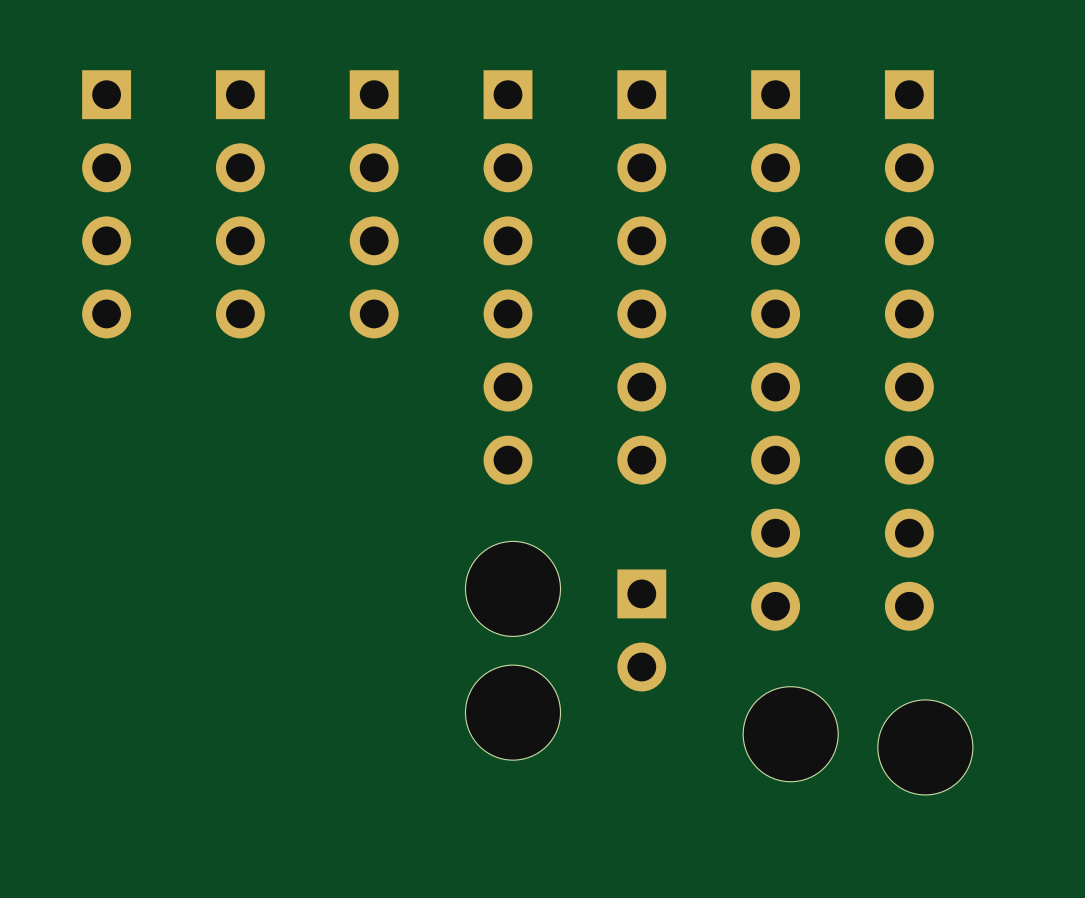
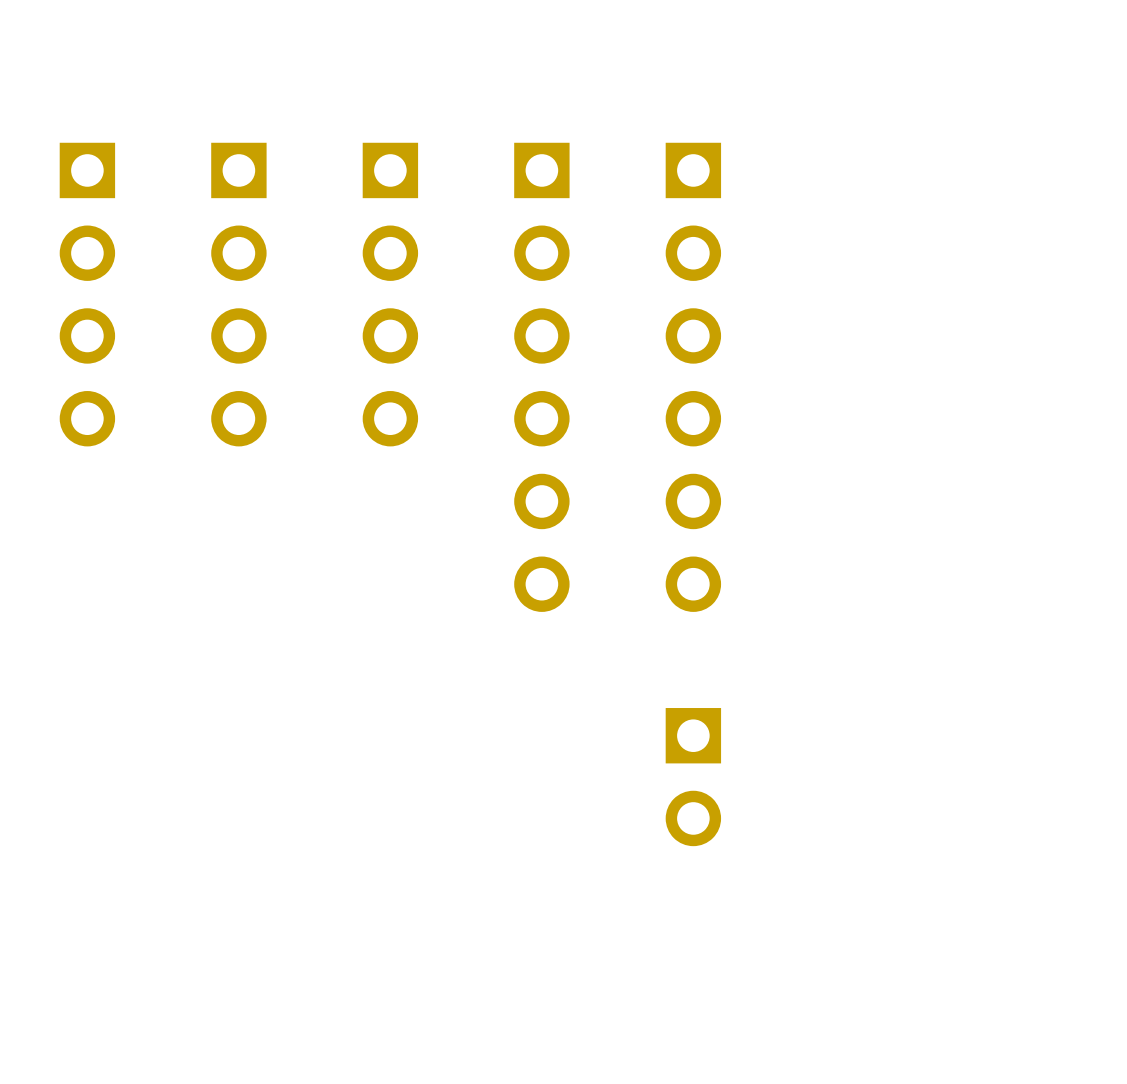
part: (775, 350) -> none
part: (909, 350) -> none
part: (513, 588) -> none
part: (513, 712) -> none
part: (790, 734) -> none
part: (925, 747) -> none

